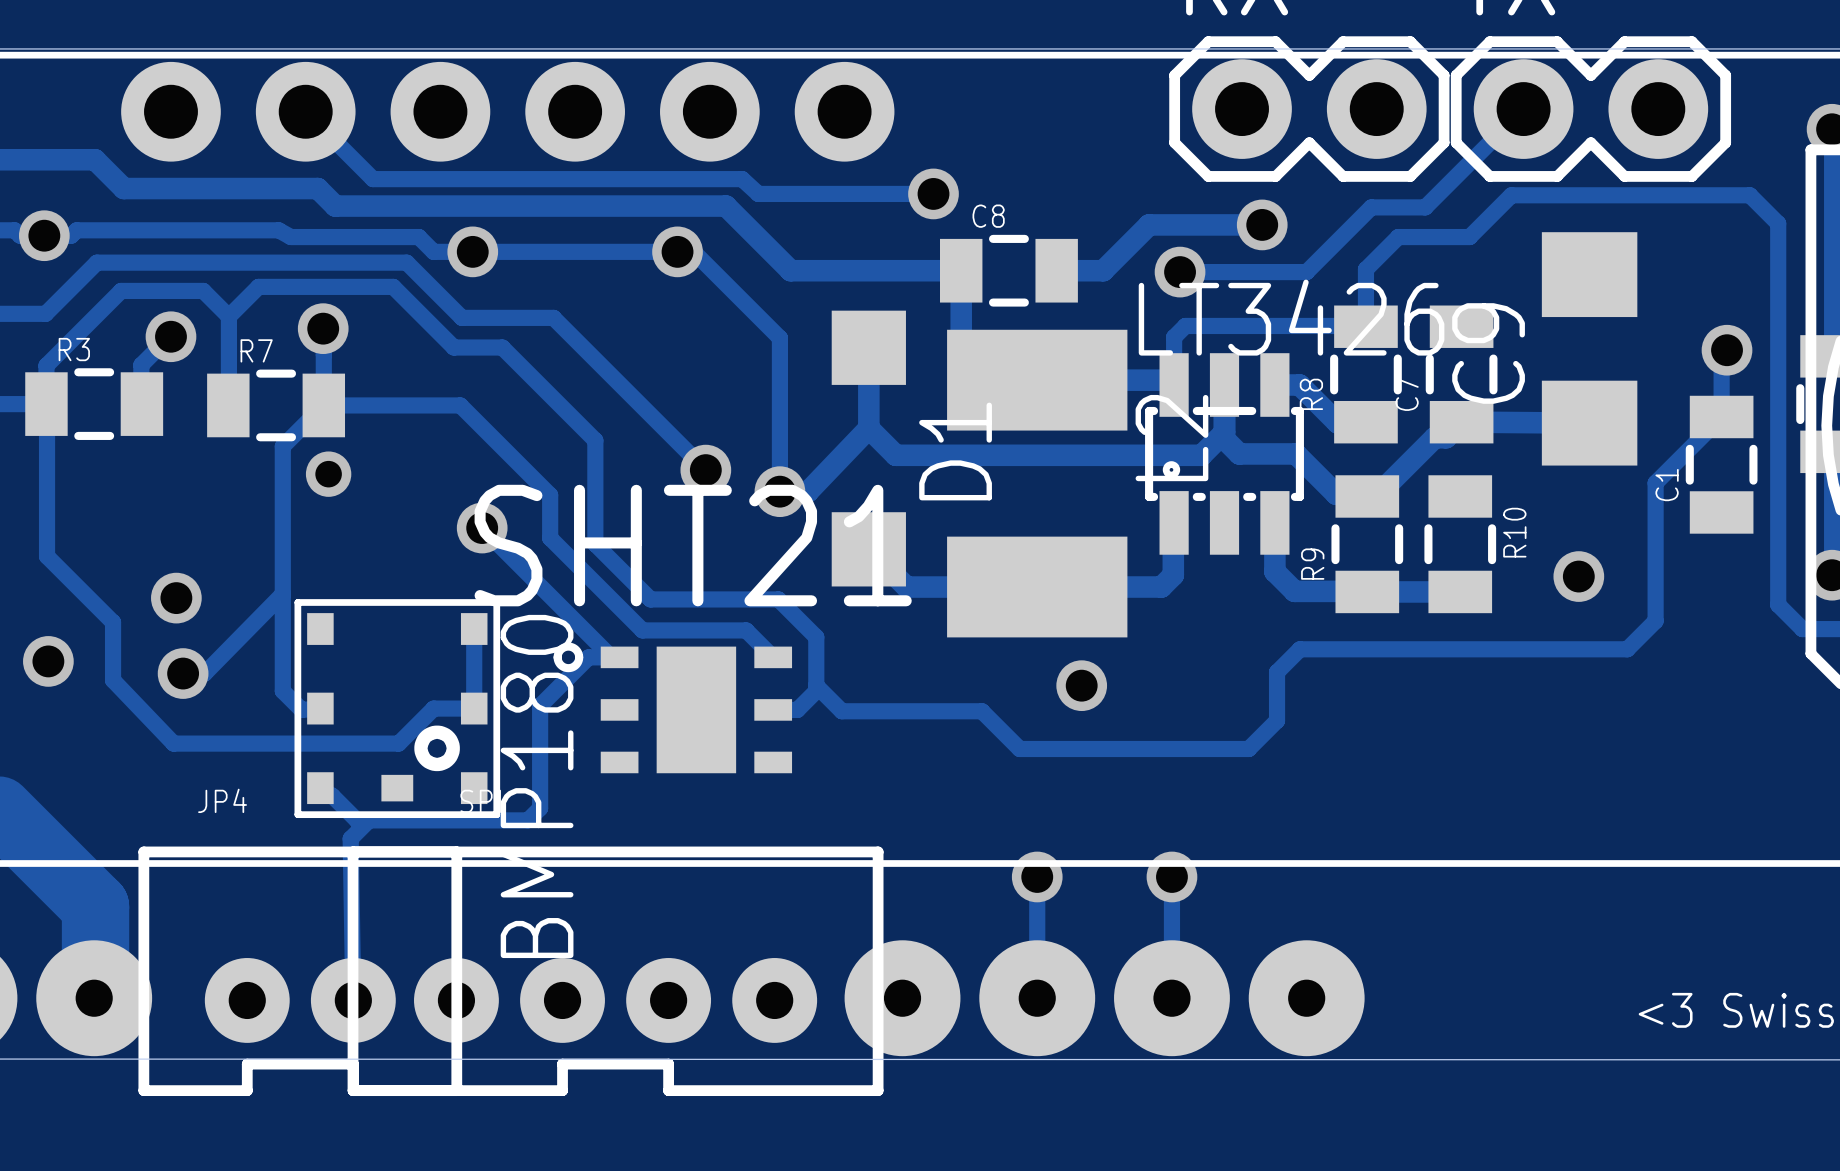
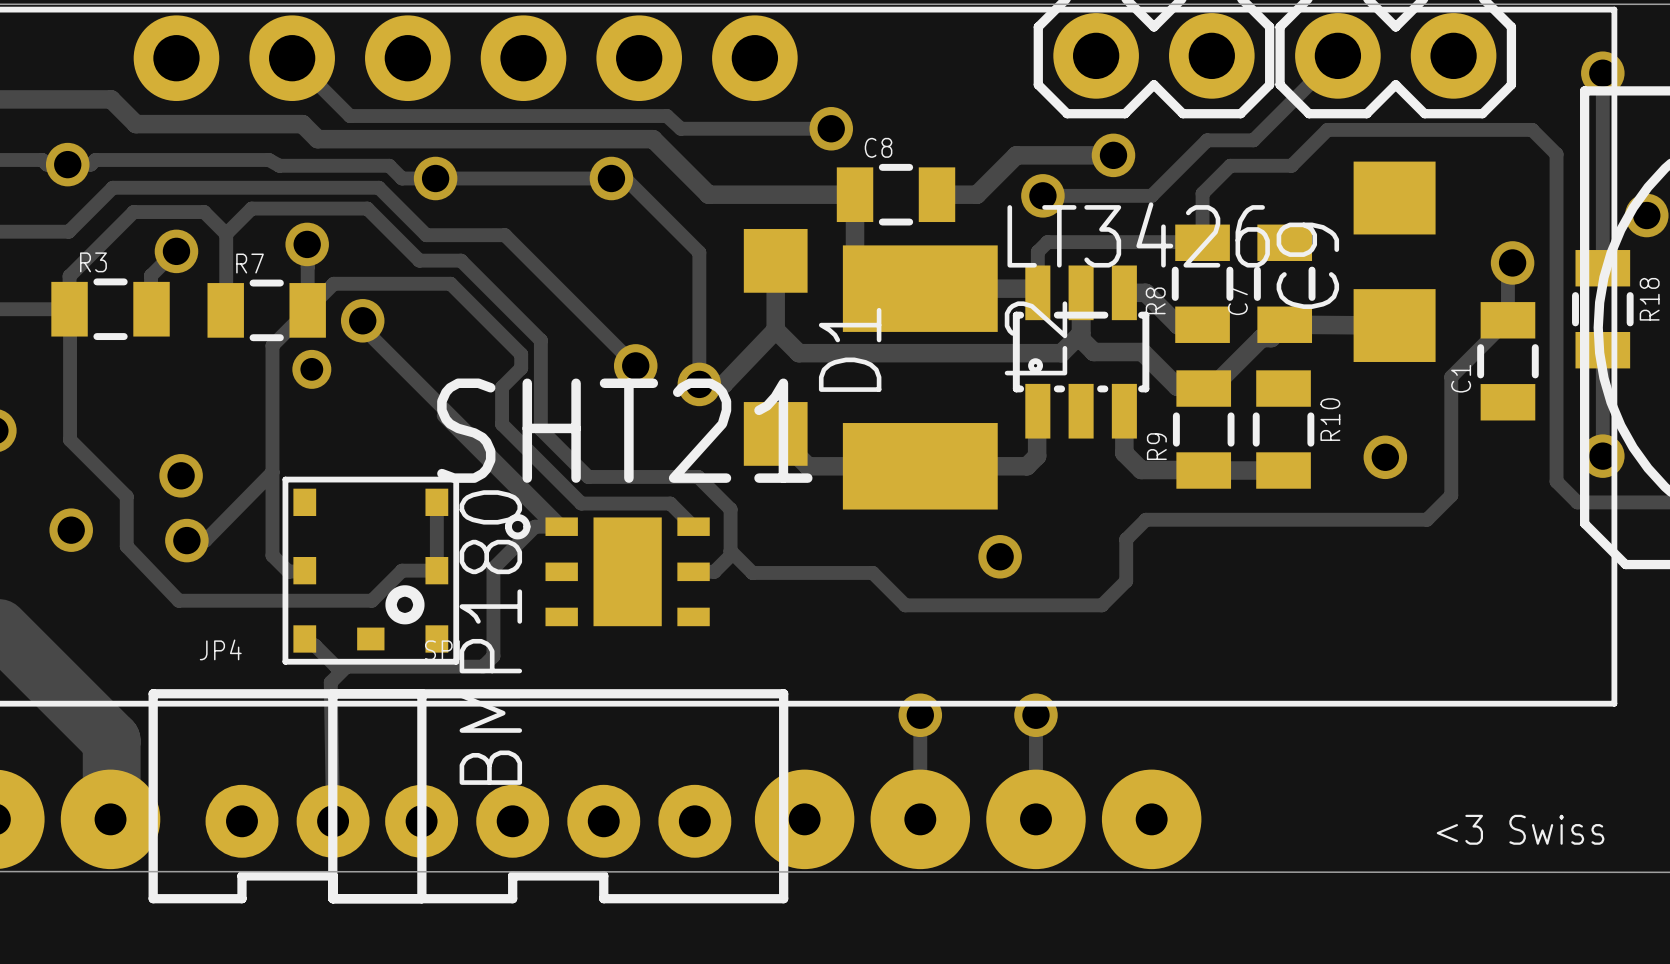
track: (323, 405) (460, 405) (550, 495) -> (307, 310) (333, 283) (450, 283) (521, 354) (521, 368) (502, 387)
track: none -> (362, 320) (363, 328) (561, 526)
via position: (482, 528) -> (362, 320)
via position: (1081, 685) -> (1000, 556)

